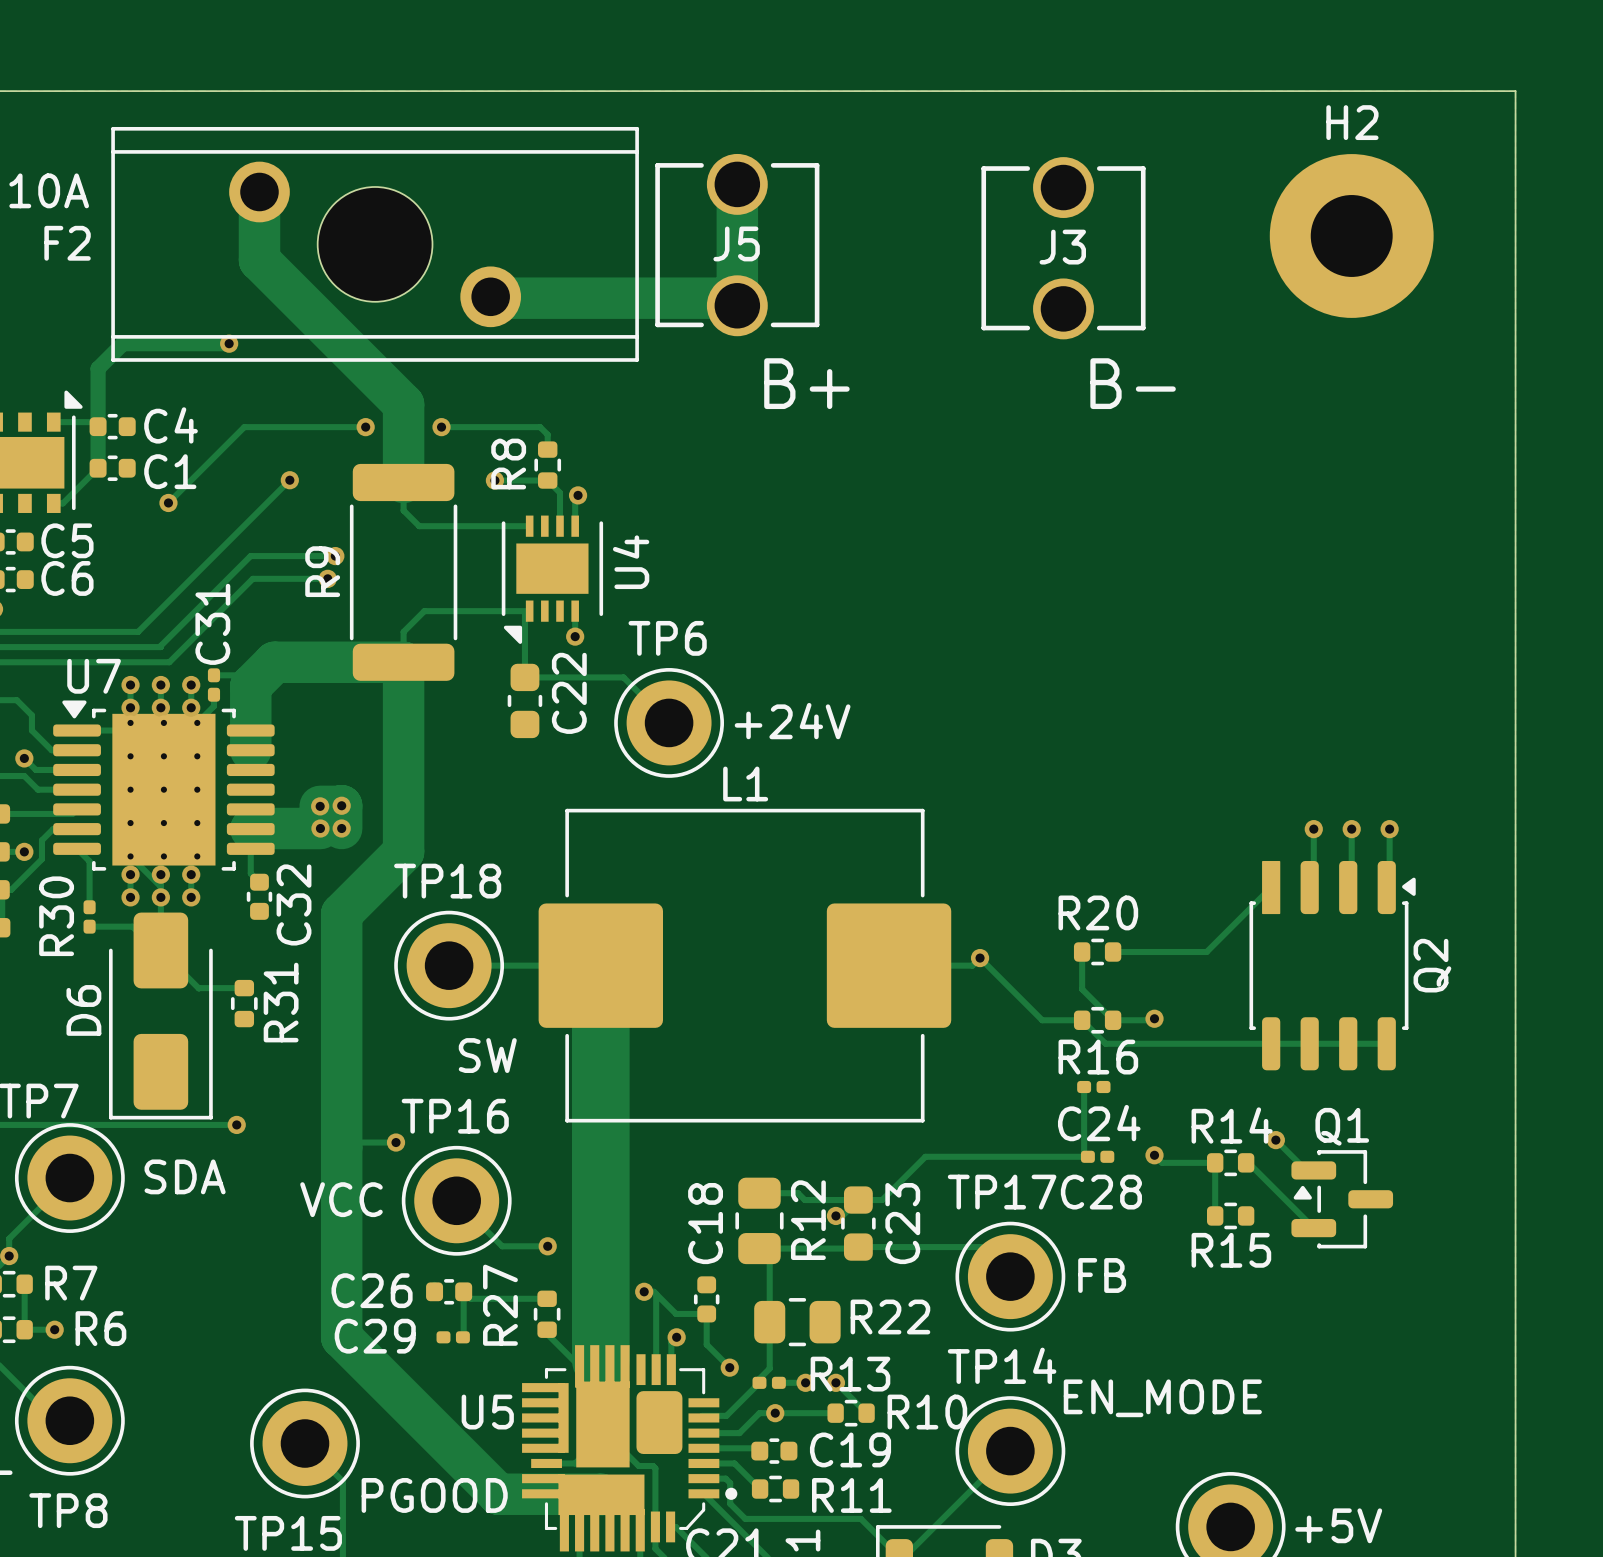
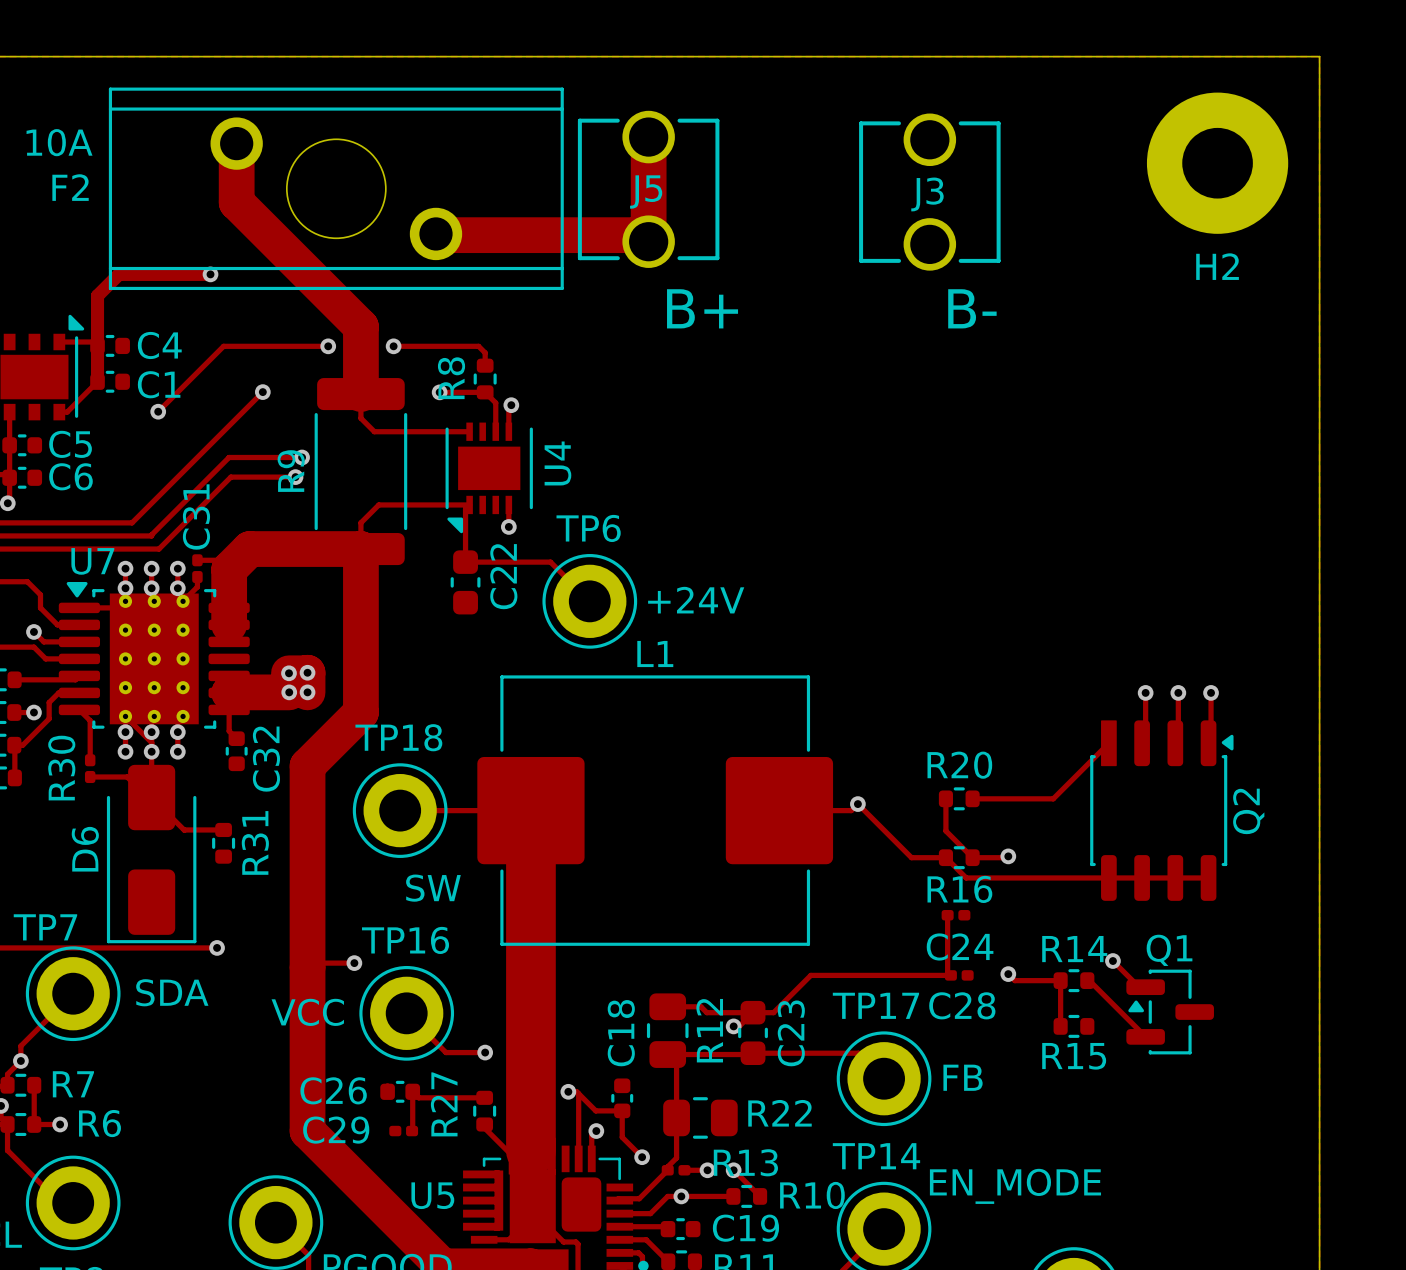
H2 name position: H2 (1352, 122) -> H2 (1217, 266)
H2 position: (1351, 235) -> (1217, 163)

